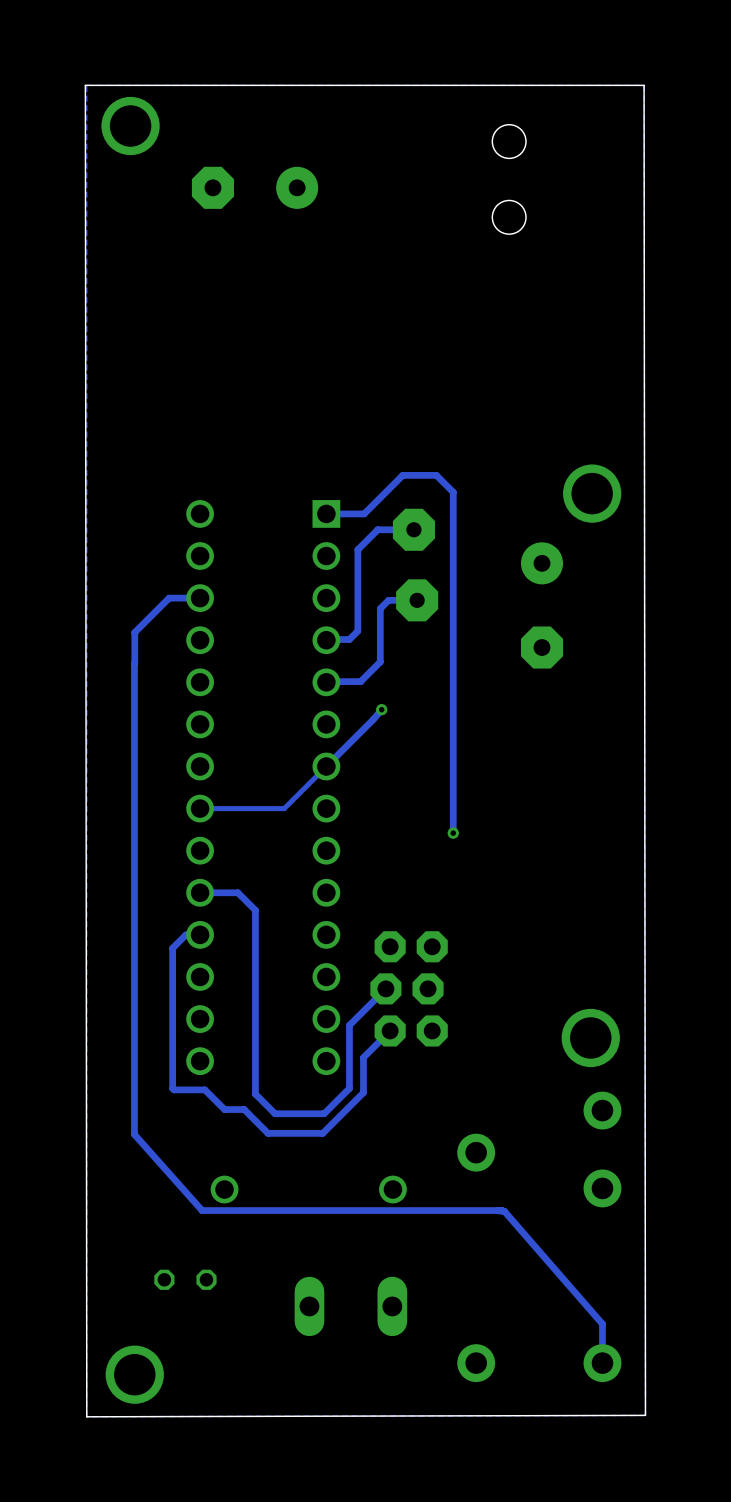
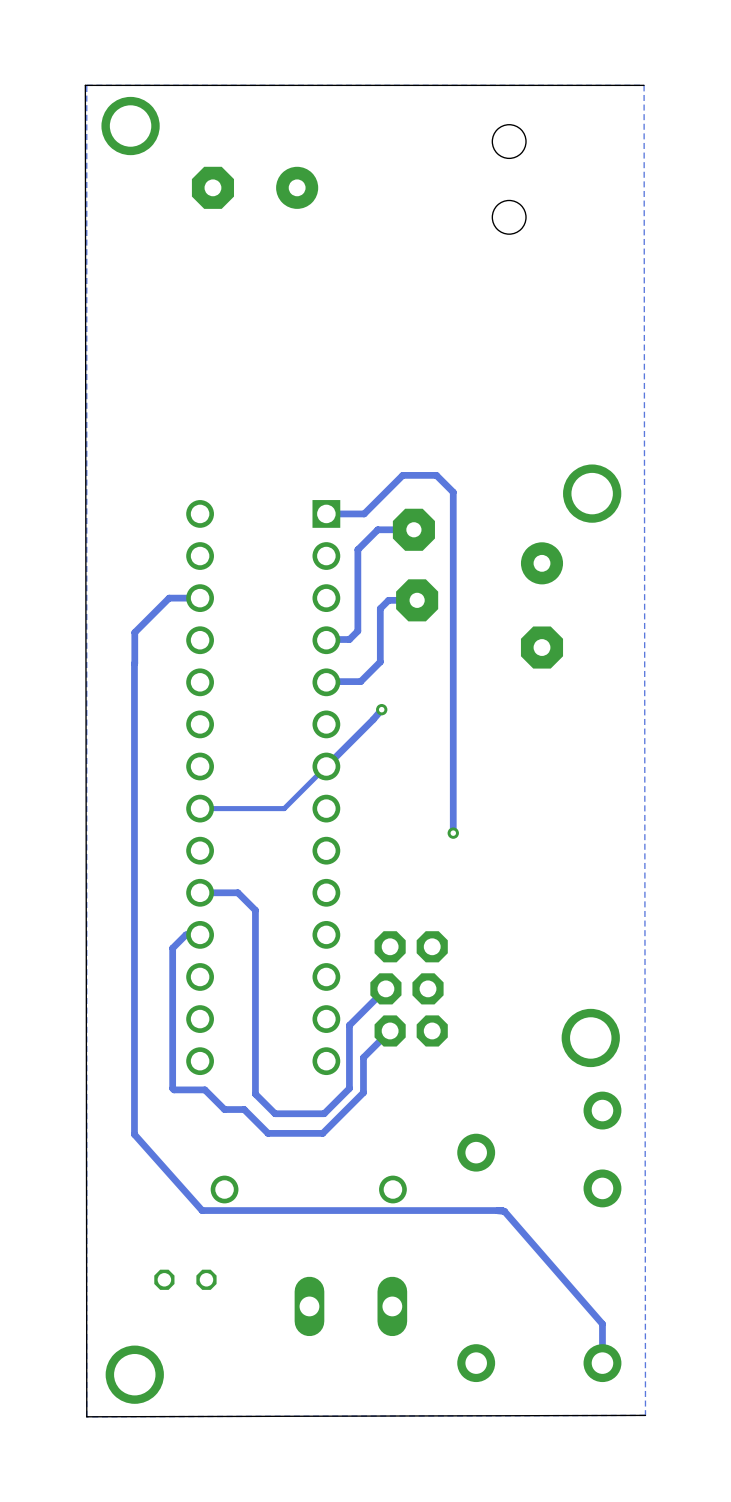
board edge: (644, 85) (645, 1415) -> none

